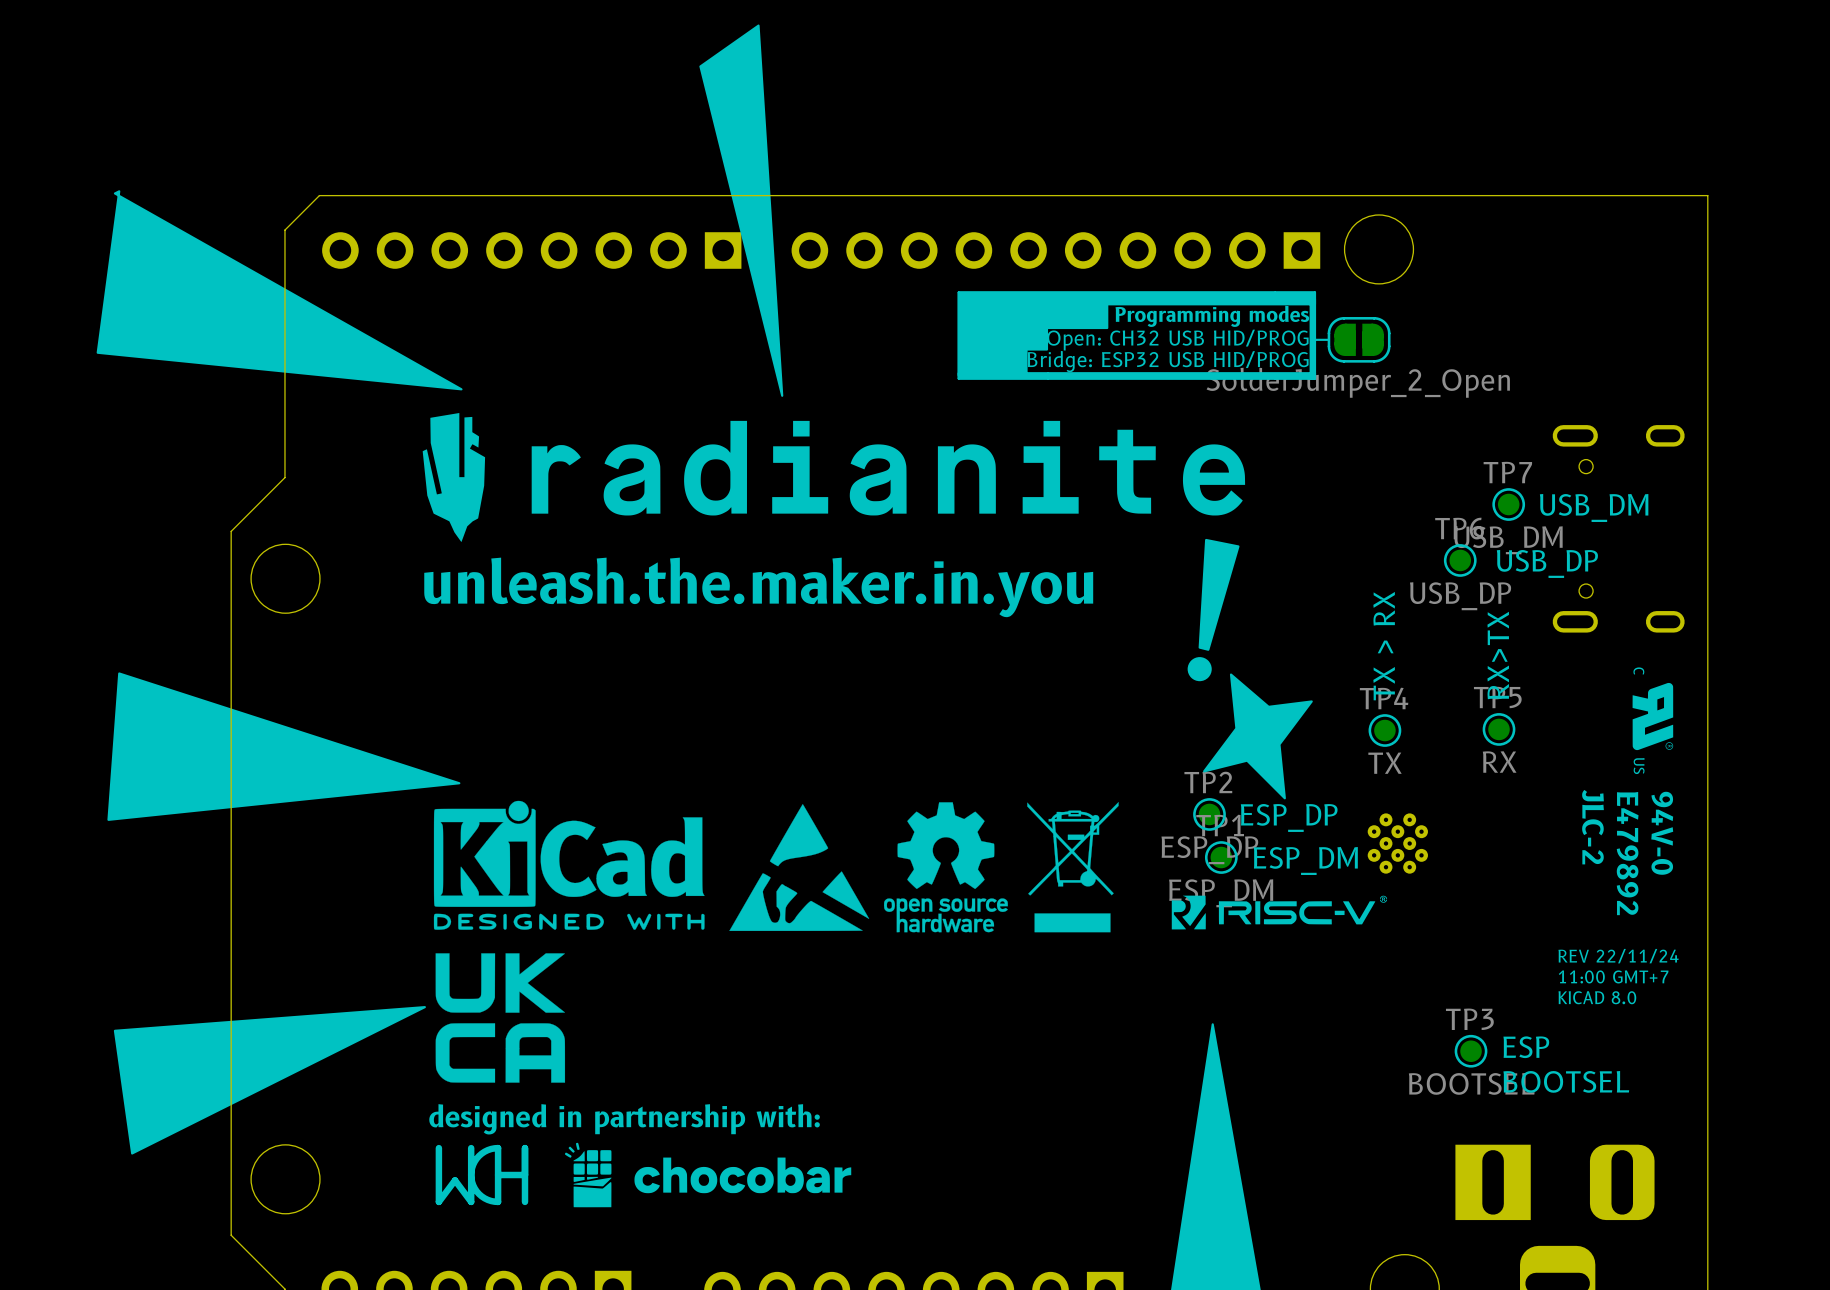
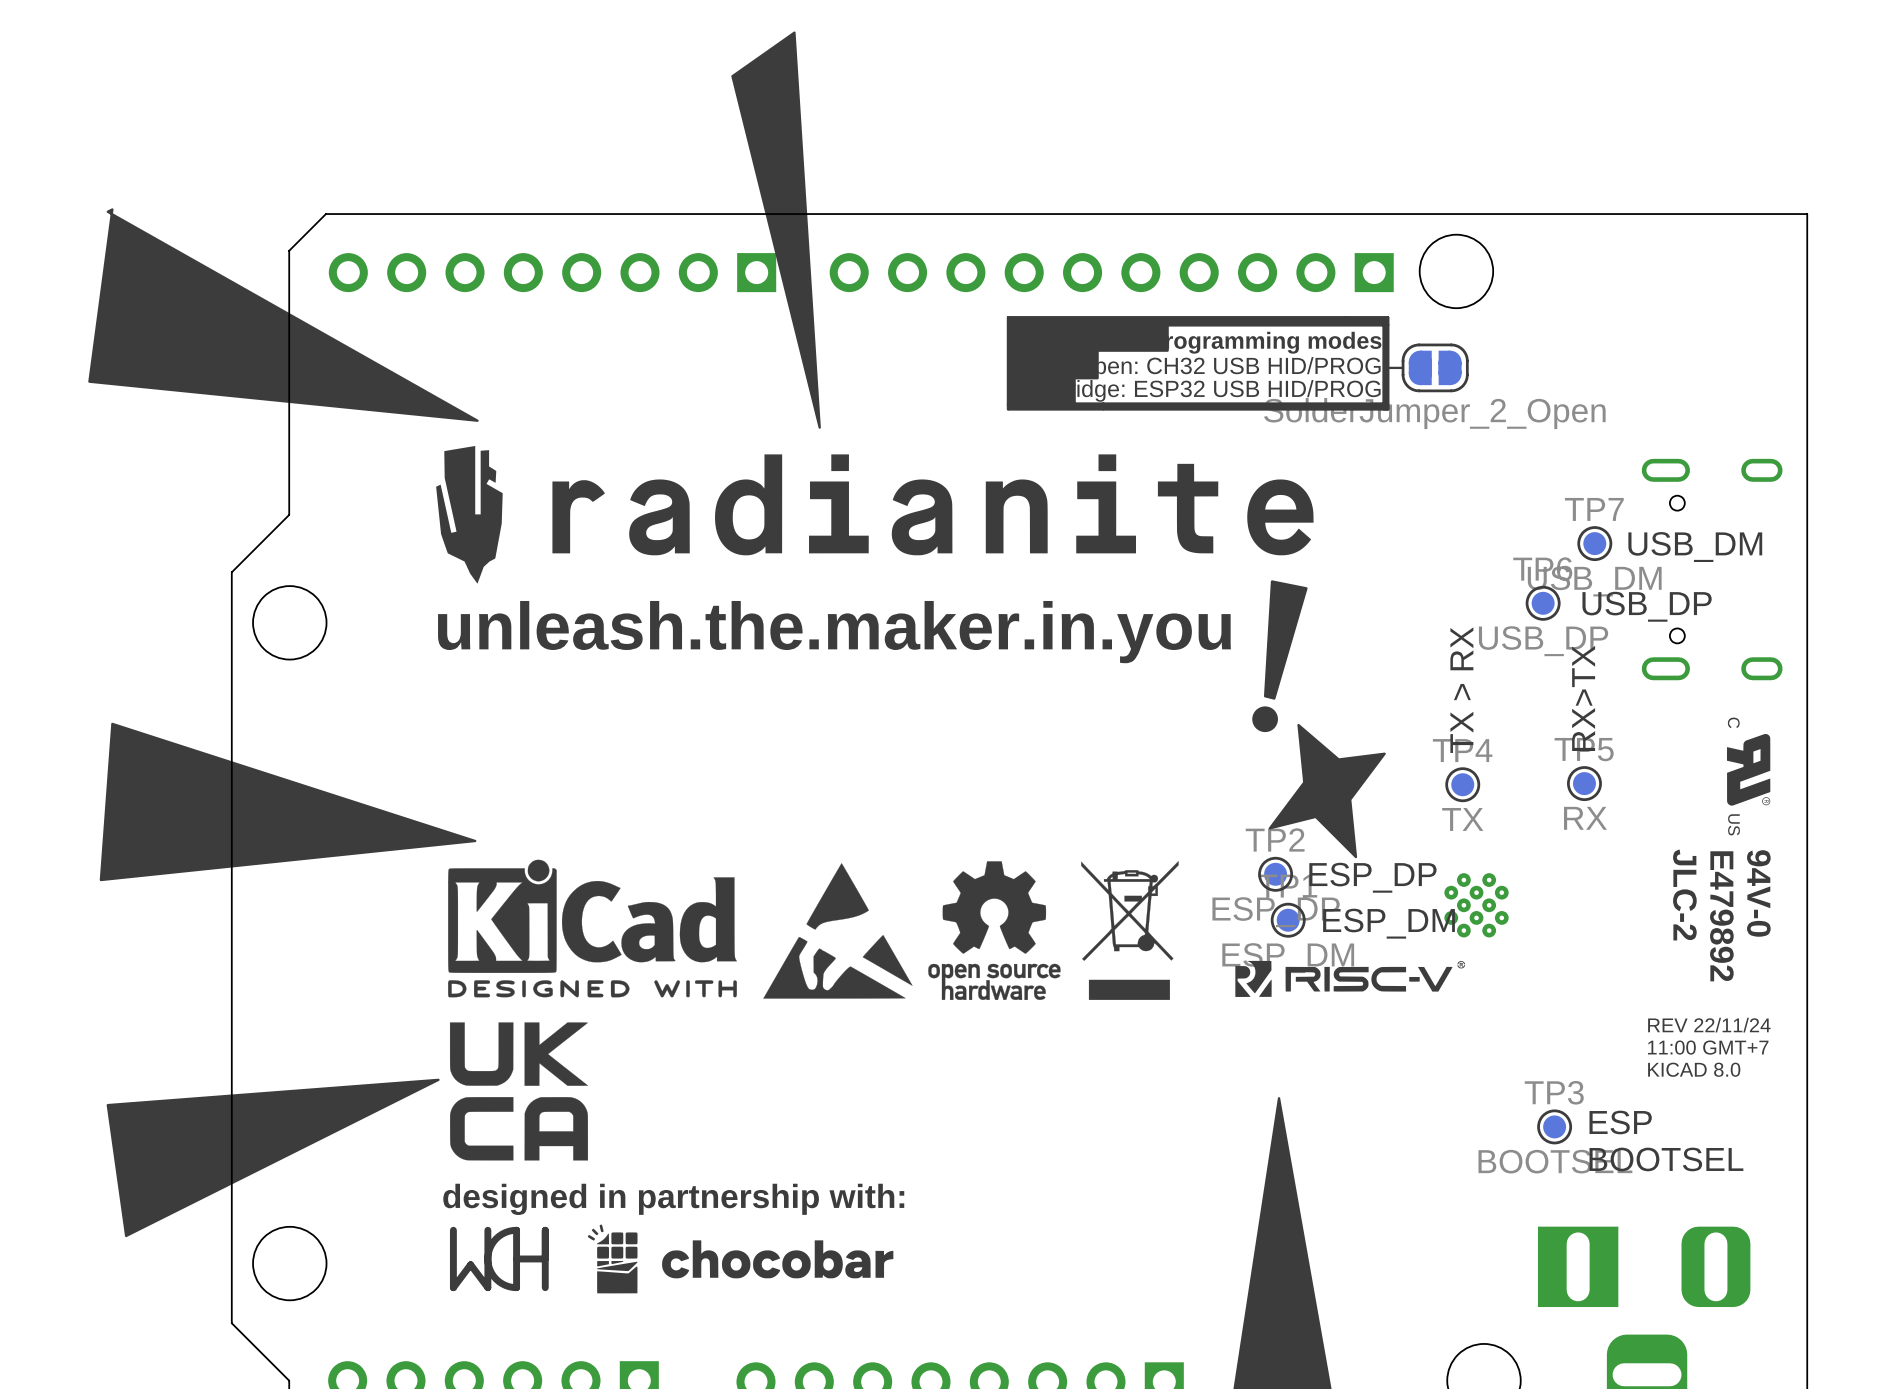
drawing shape: [957, 291, 1317, 377] -> [1006, 316, 1390, 407]

